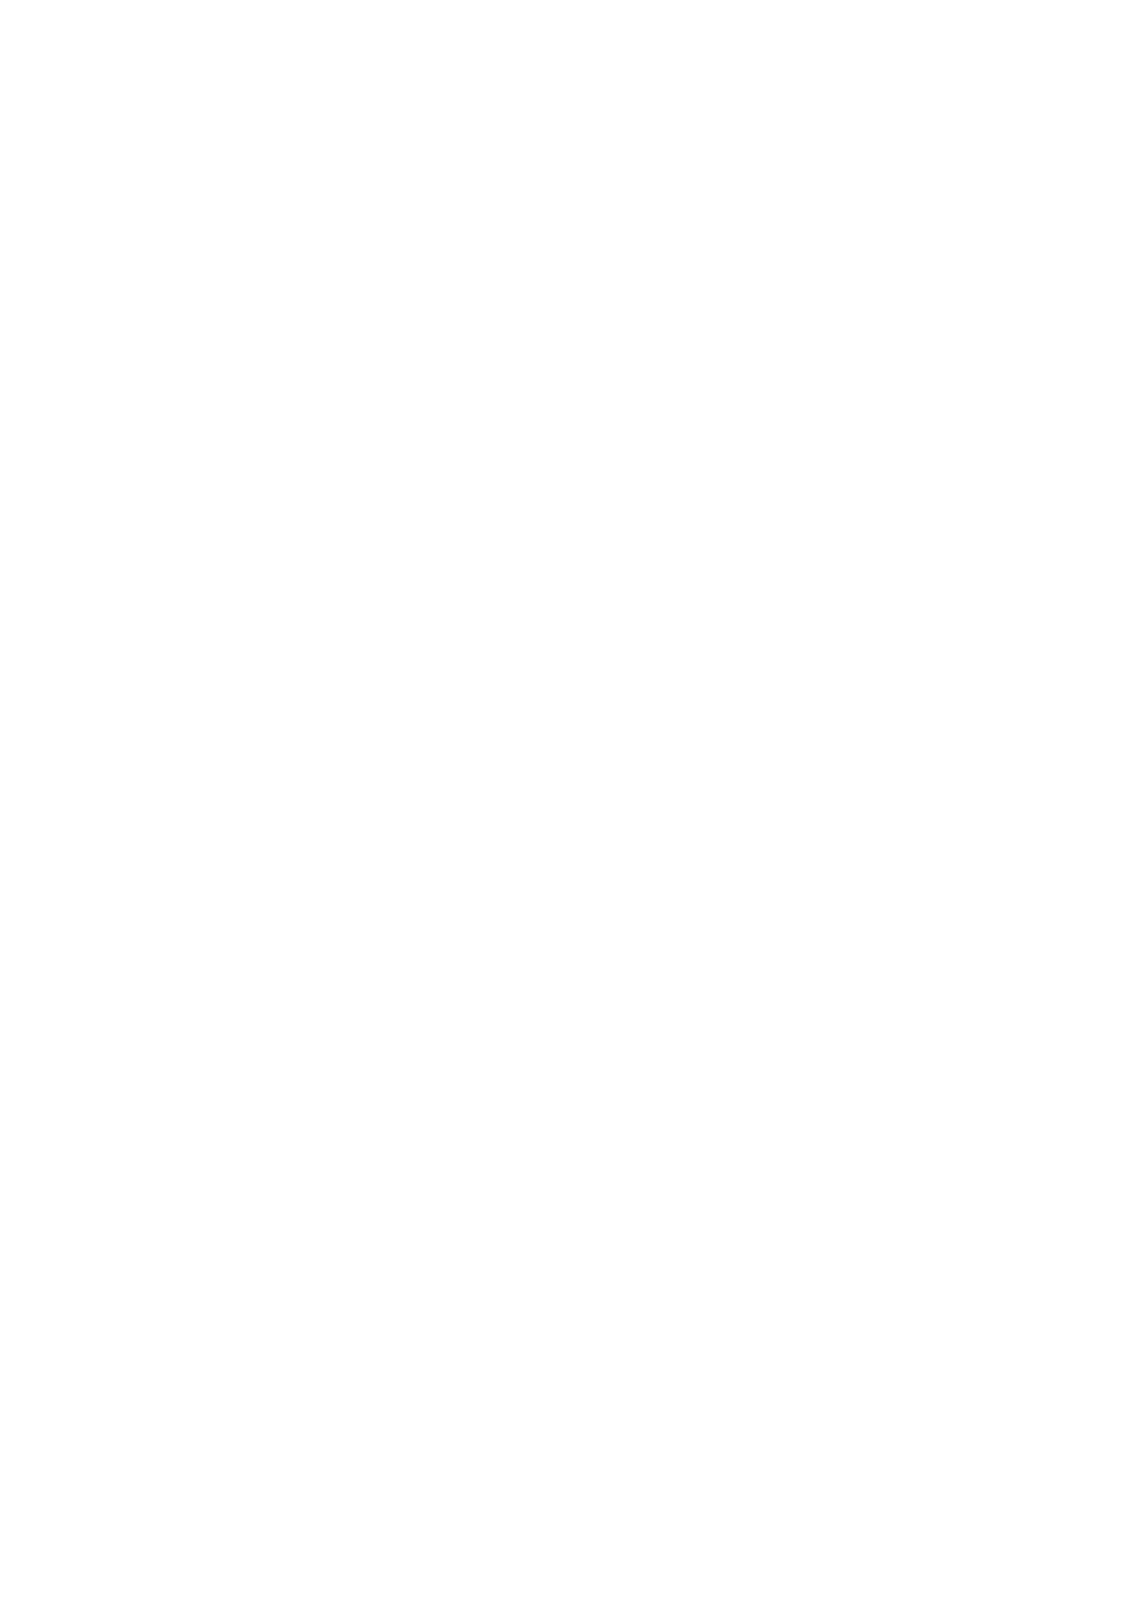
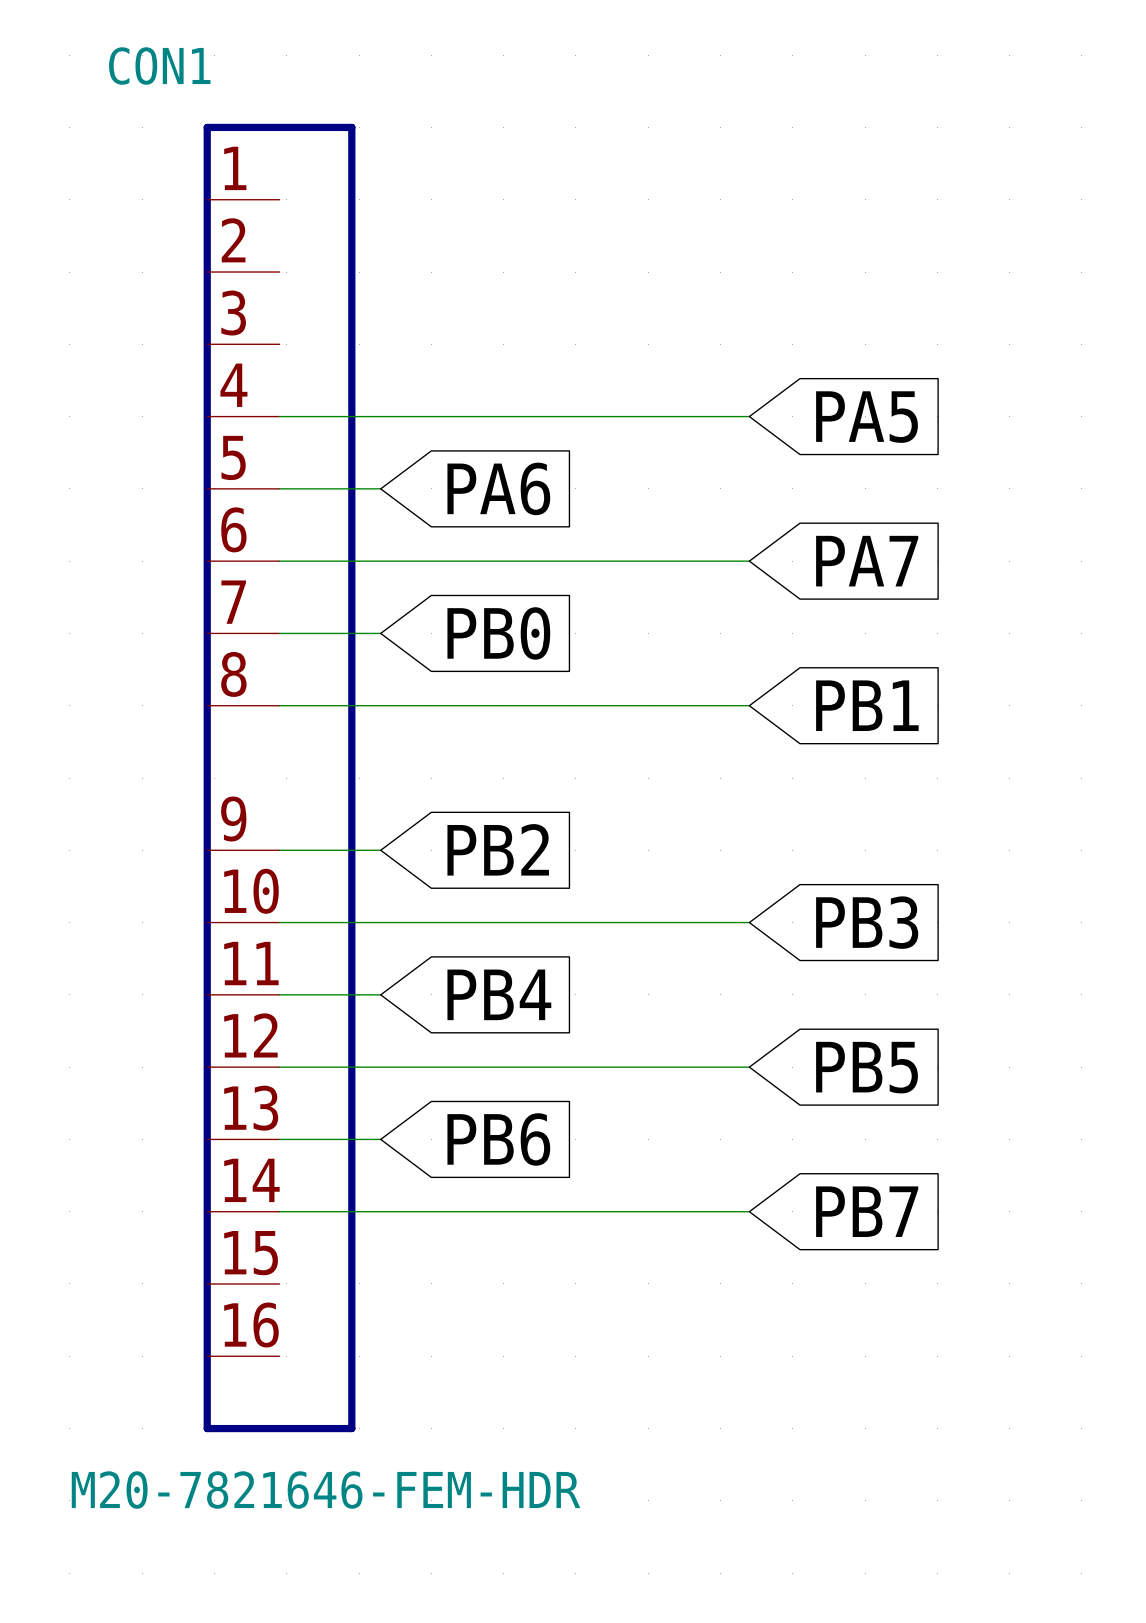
wire: none -> (279, 416) (749, 416)
global label: none -> PA5 (867, 417)
wire: none -> (279, 488) (380, 488)
global label: none -> PA6 (498, 488)
wire: none -> (279, 561) (749, 561)
global label: none -> PA7 (867, 561)
wire: none -> (279, 633) (380, 633)
global label: none -> PB0 (498, 633)
wire: none -> (279, 705) (749, 705)
global label: none -> PB1 (867, 705)
CON1: none -> M20-7821646-FEM-HDR (279, 778)
wire: none -> (279, 850) (380, 850)
global label: none -> PB2 (498, 849)
wire: none -> (279, 922) (749, 922)
global label: none -> PB3 (867, 922)
wire: none -> (279, 994) (380, 994)
global label: none -> PB4 (499, 994)
wire: none -> (279, 1067) (749, 1067)
global label: none -> PB5 (867, 1067)
wire: none -> (279, 1139) (380, 1139)
global label: none -> PB6 (498, 1139)
wire: none -> (279, 1211) (749, 1211)
global label: none -> PB7 (867, 1211)

